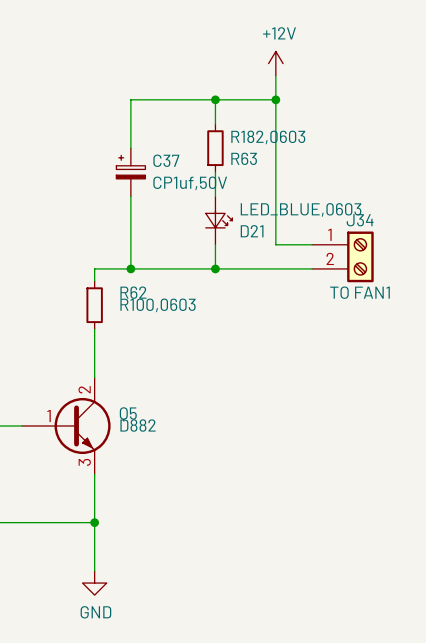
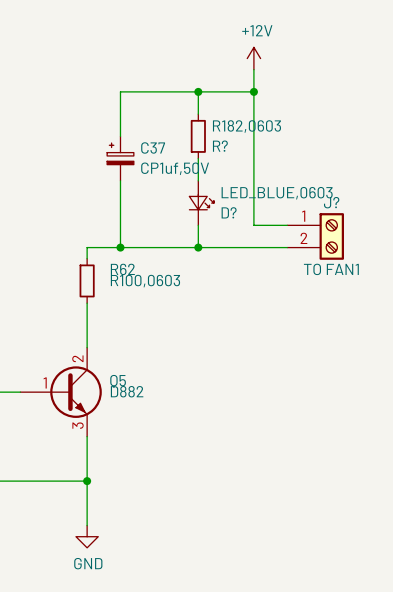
R63 name: R63 (244, 158) -> R? (220, 146)
J34 name: J34 (360, 220) -> J? (331, 202)
D21 name: D21 (252, 231) -> D? (229, 212)

